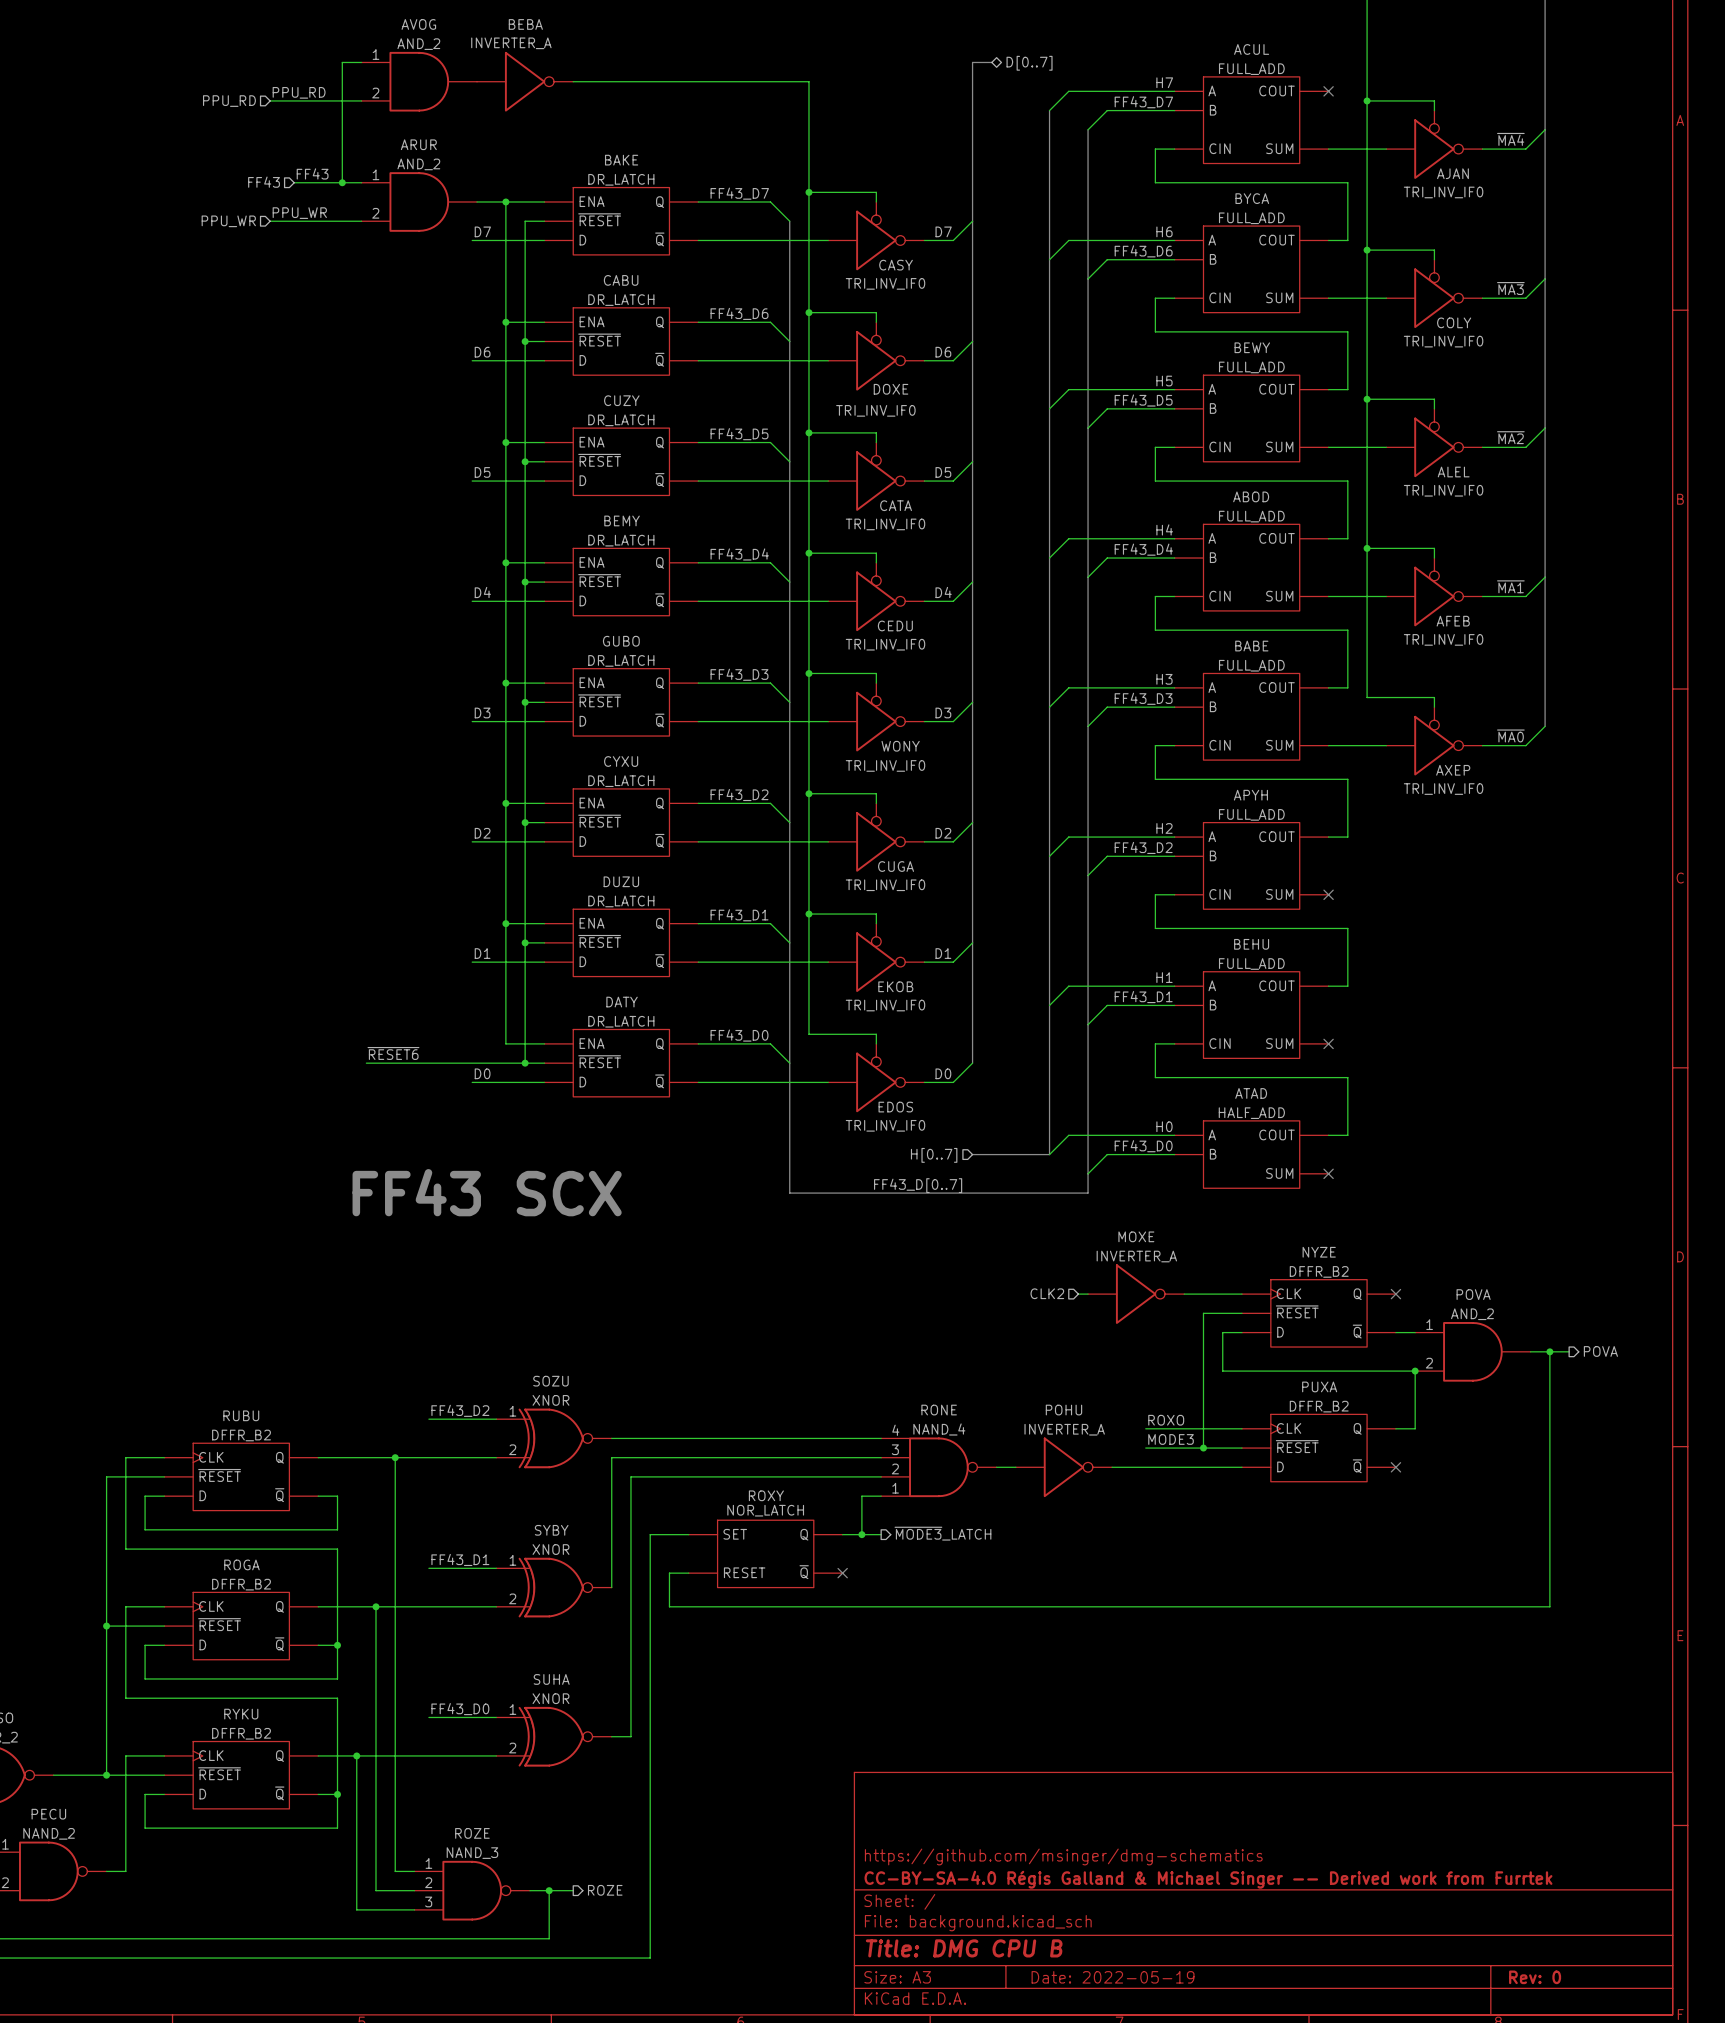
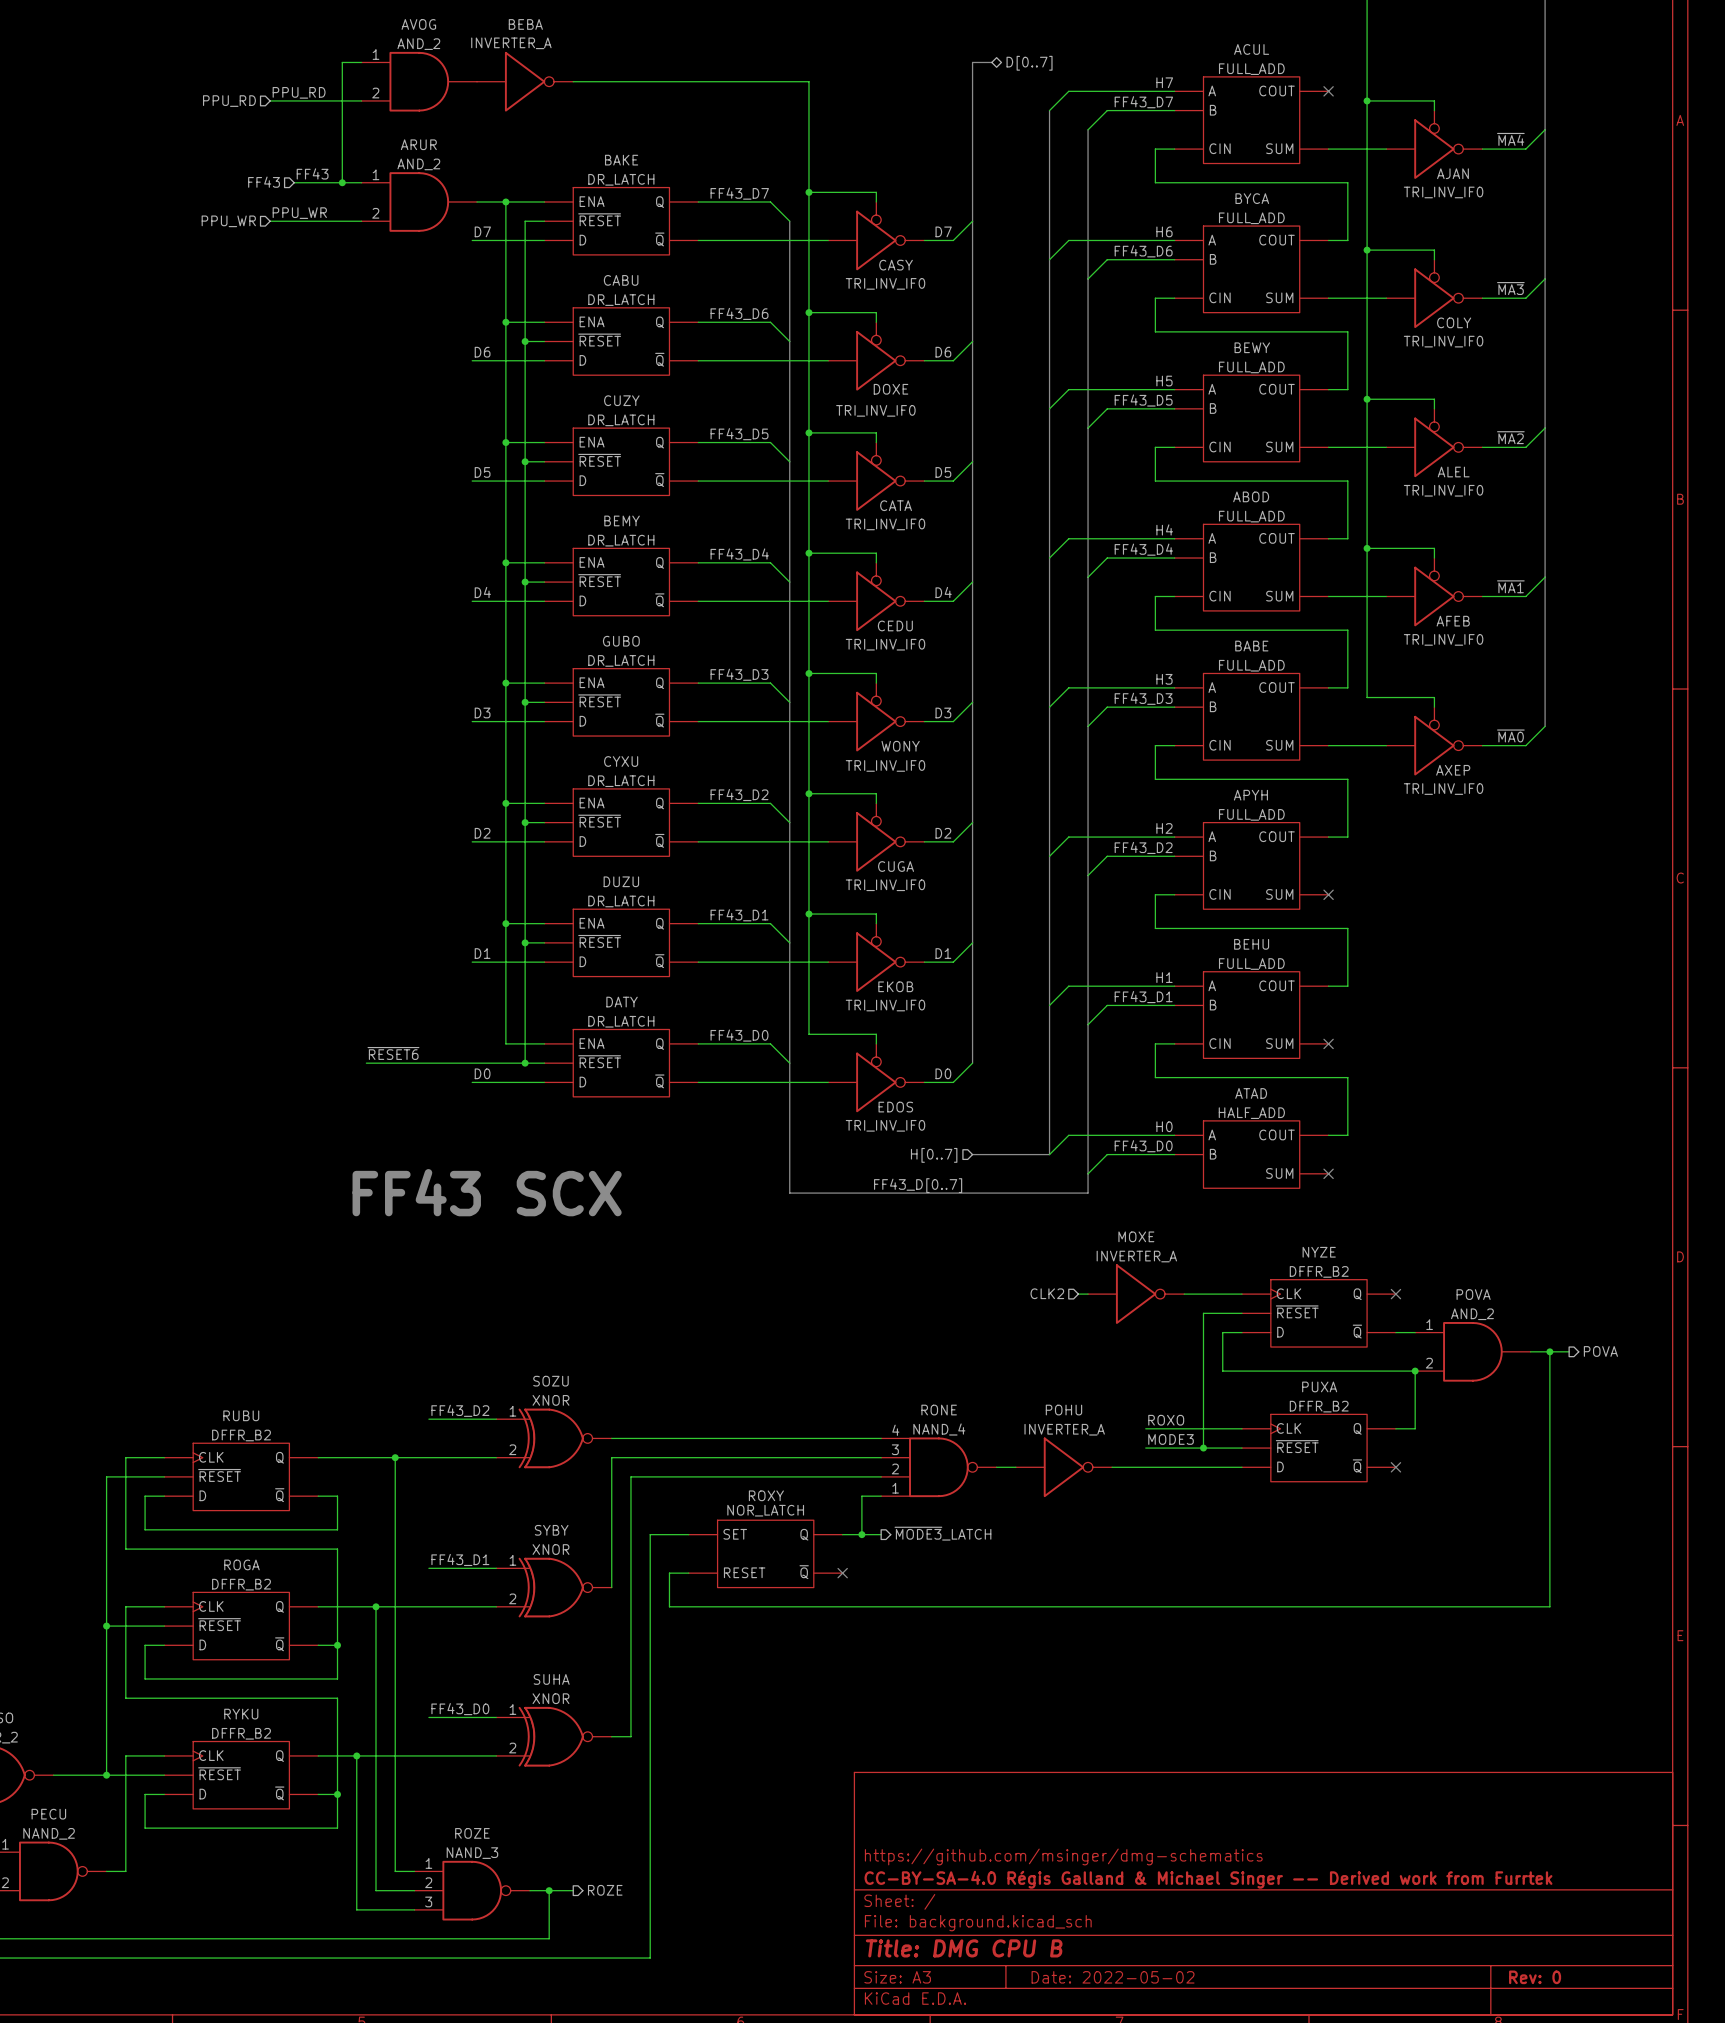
title block: Date: 2022-05-19 (1113, 1977) -> Date: 2022-05-02 (1113, 1977)

